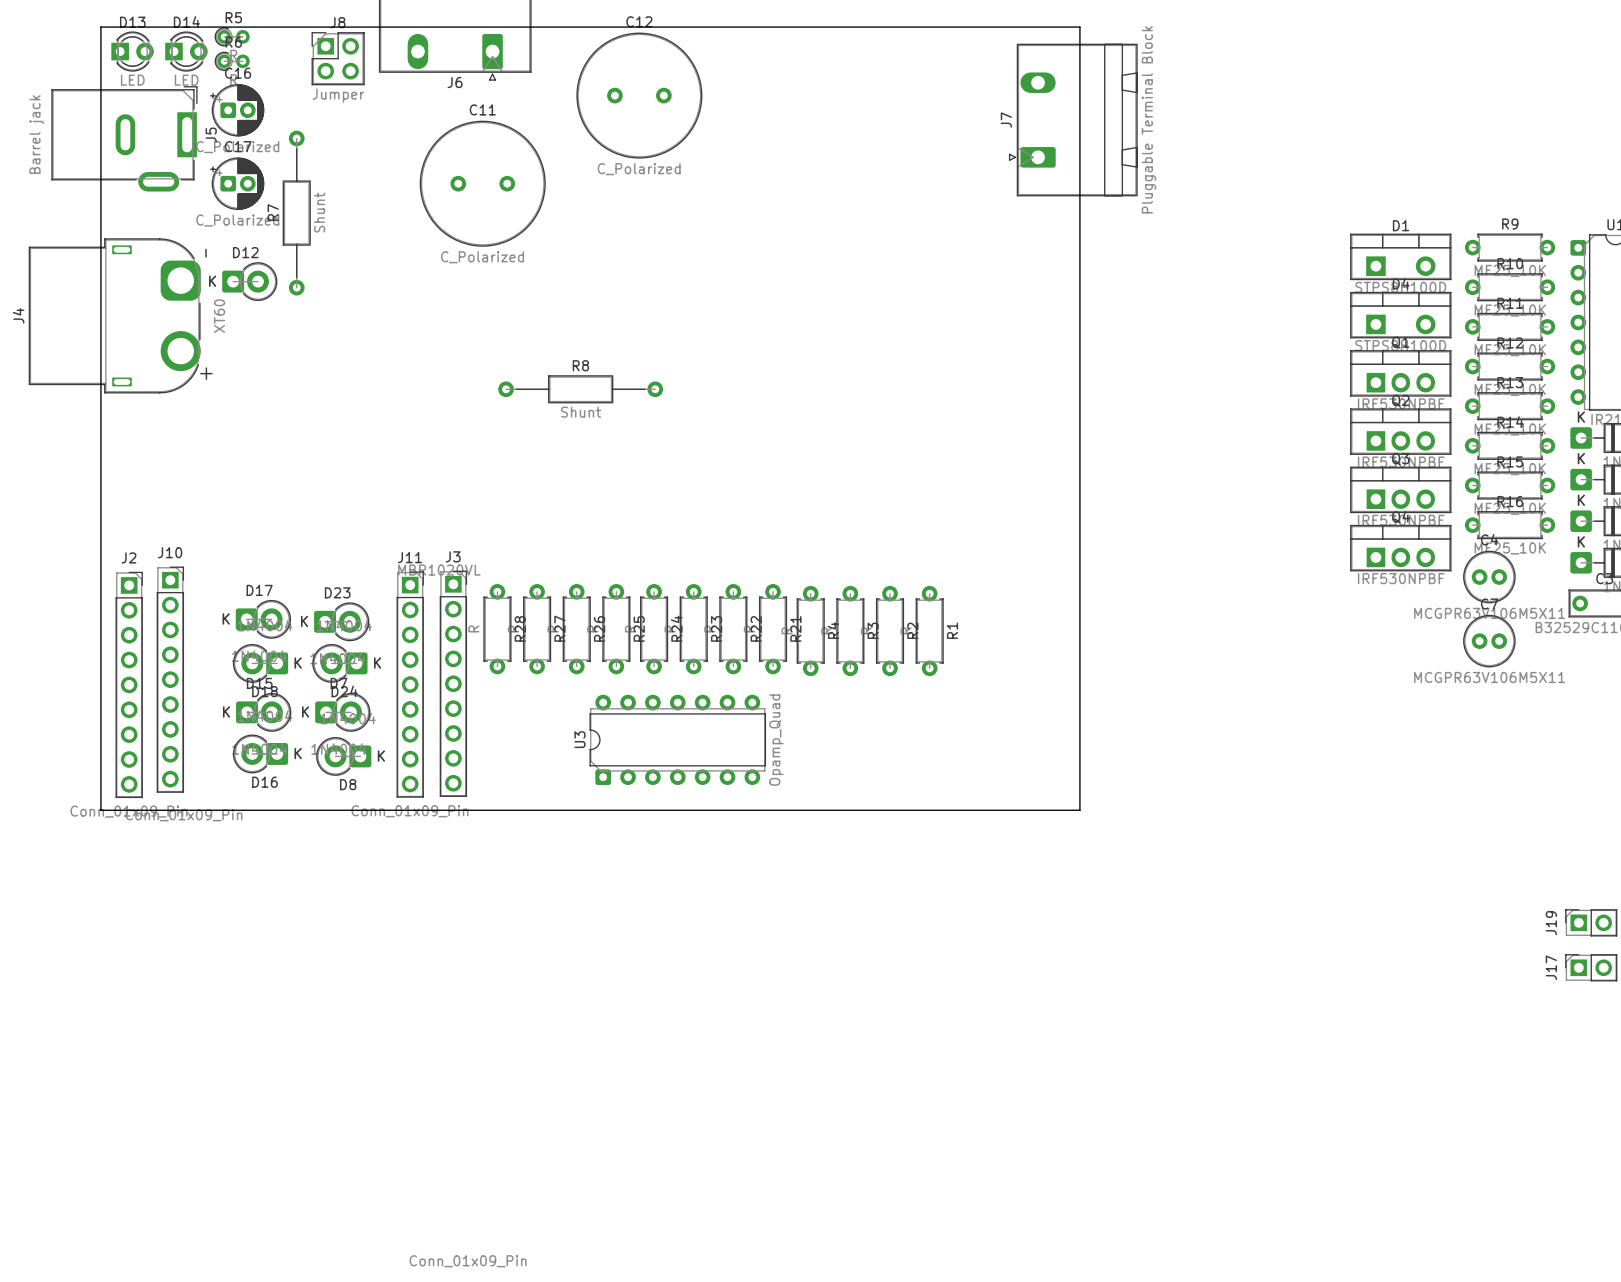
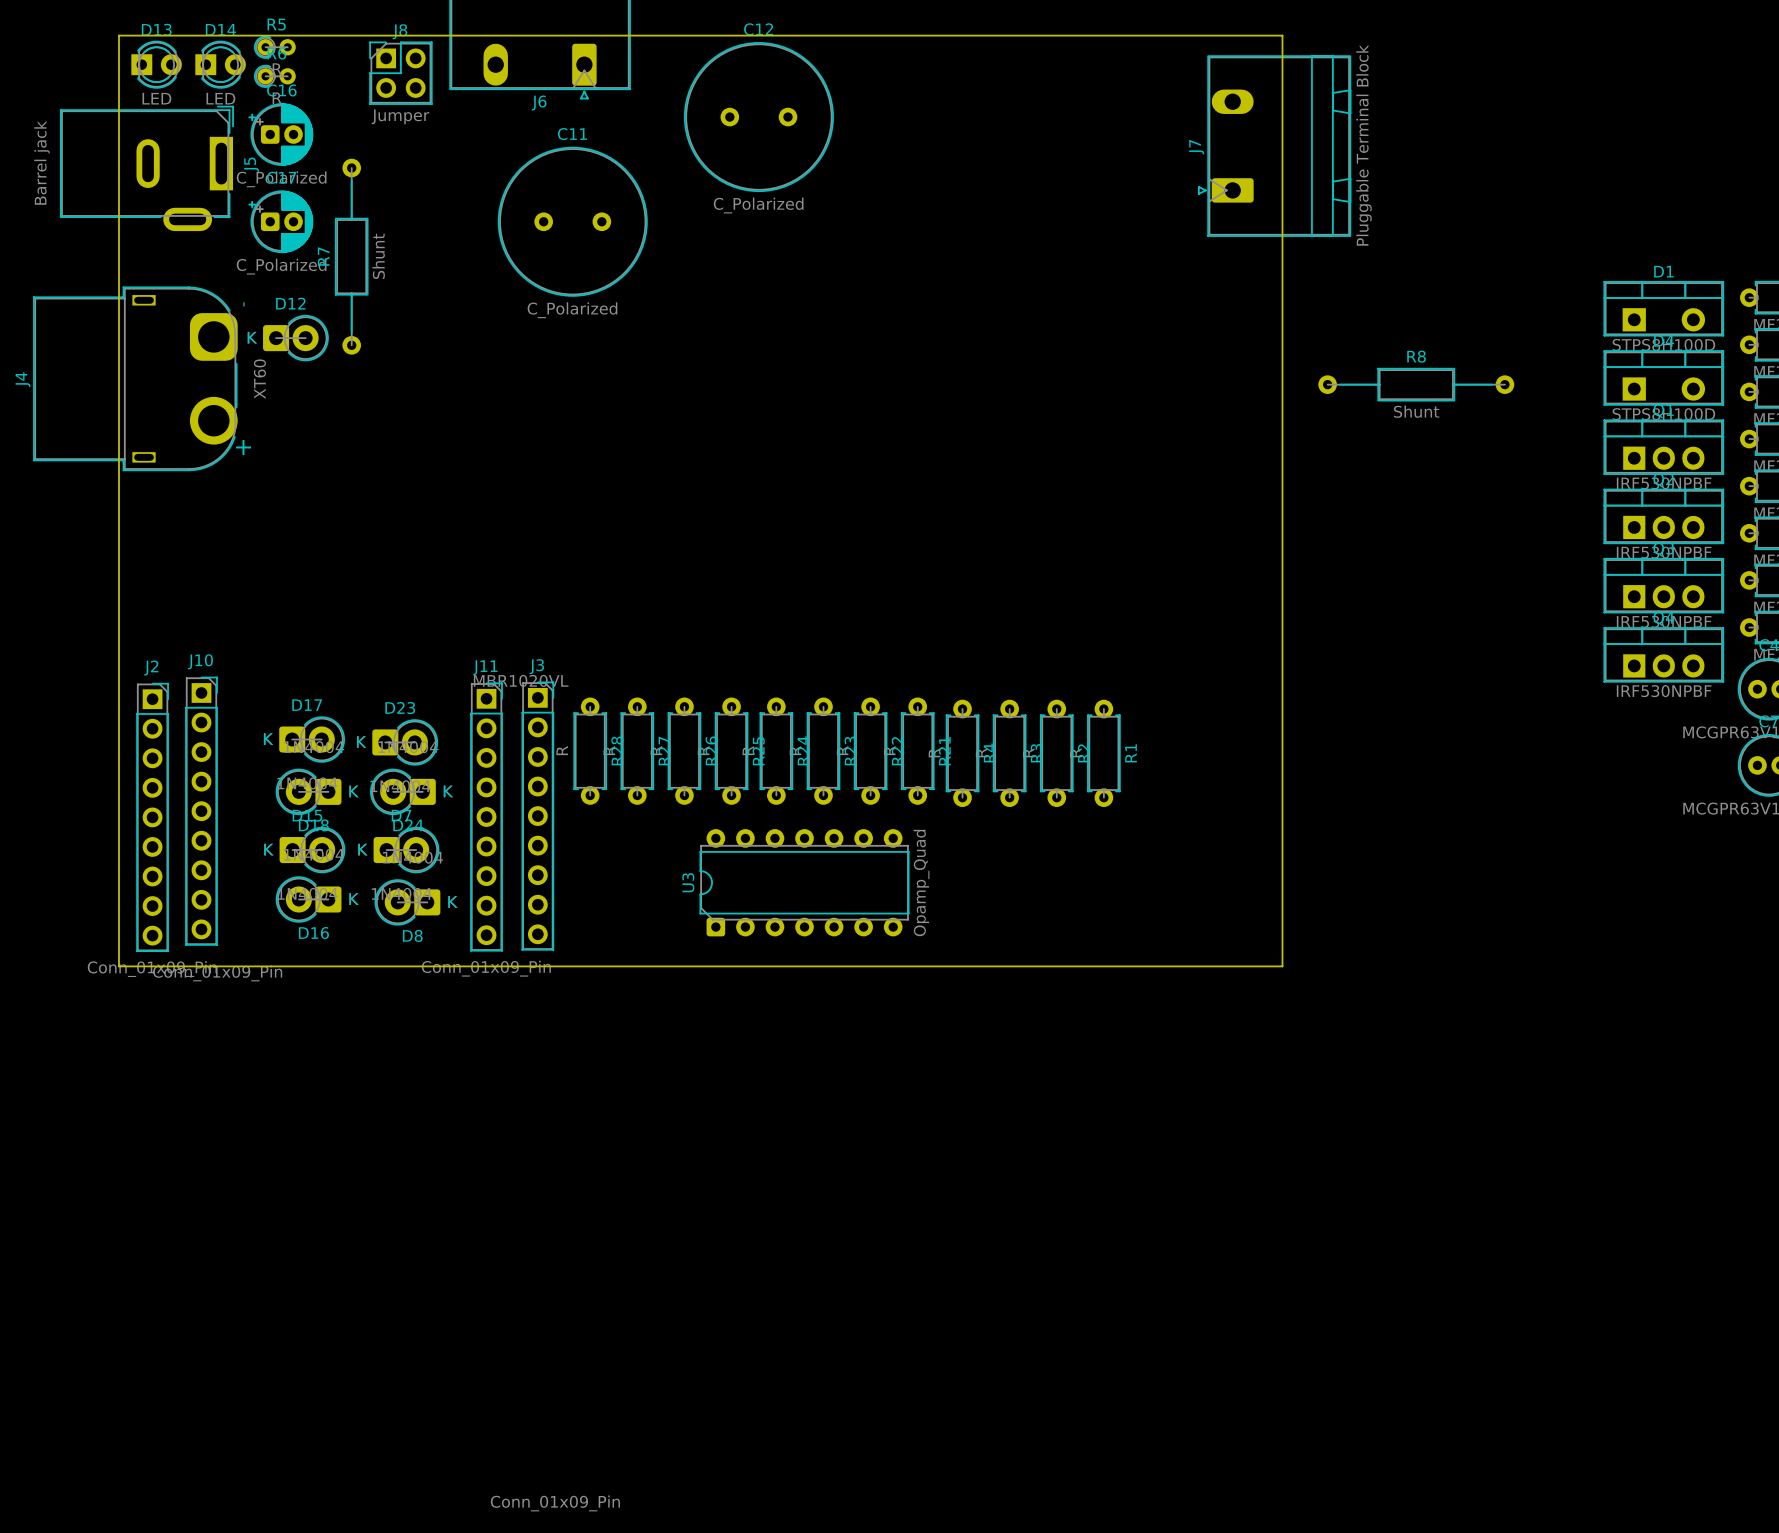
R8 position: (580, 389) -> (1416, 384)

